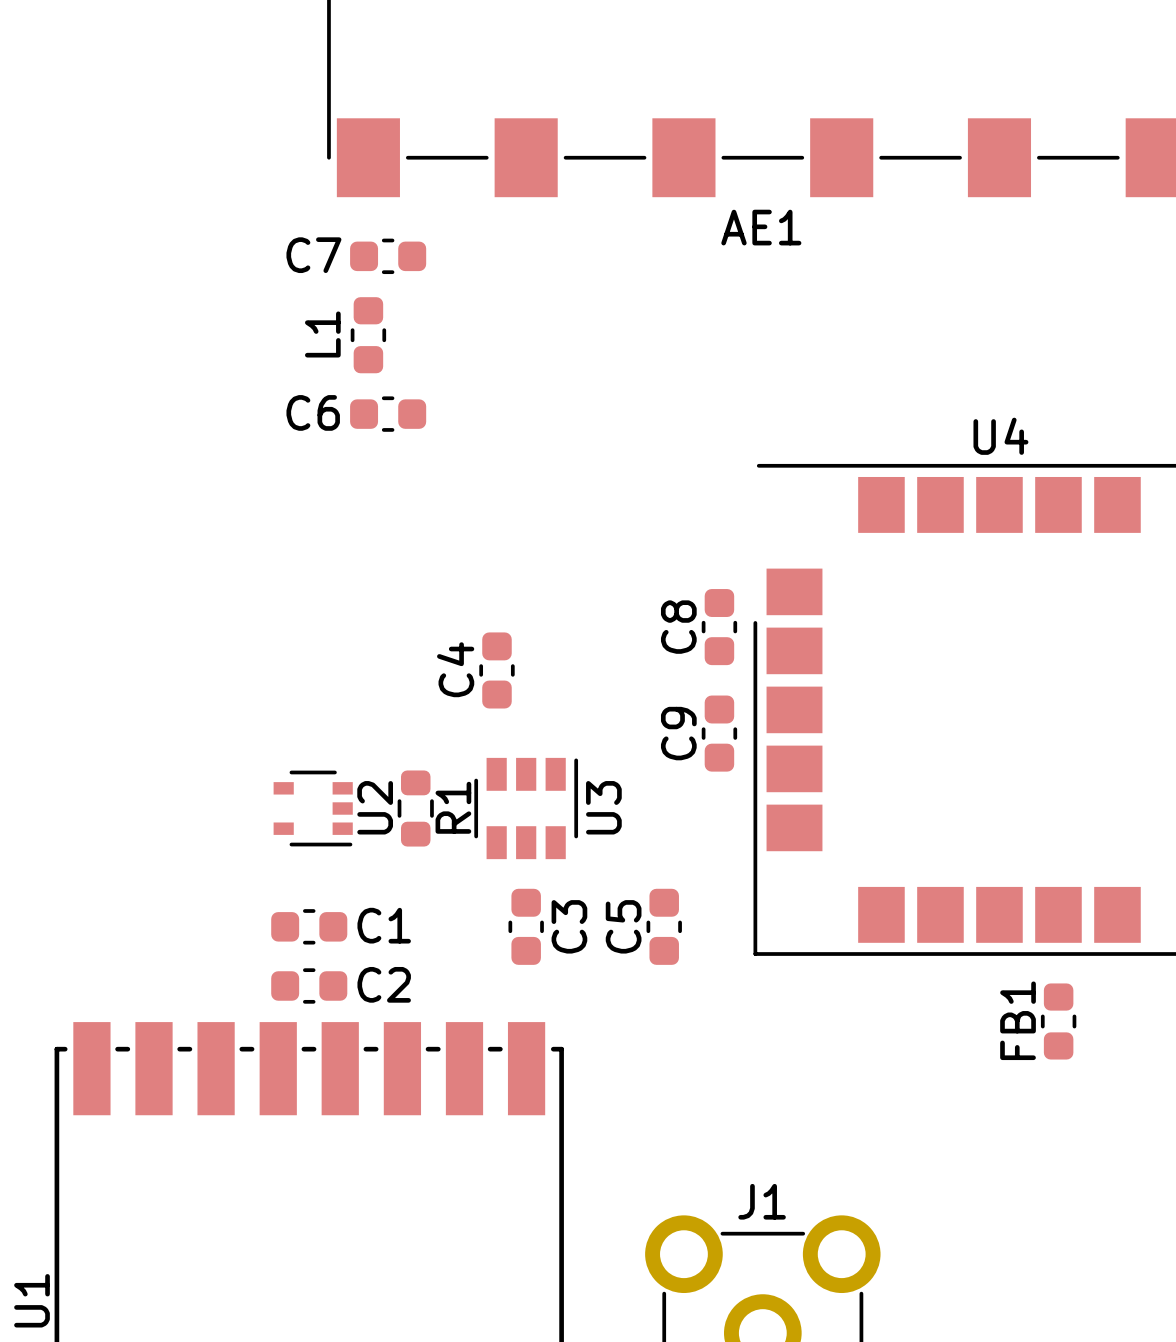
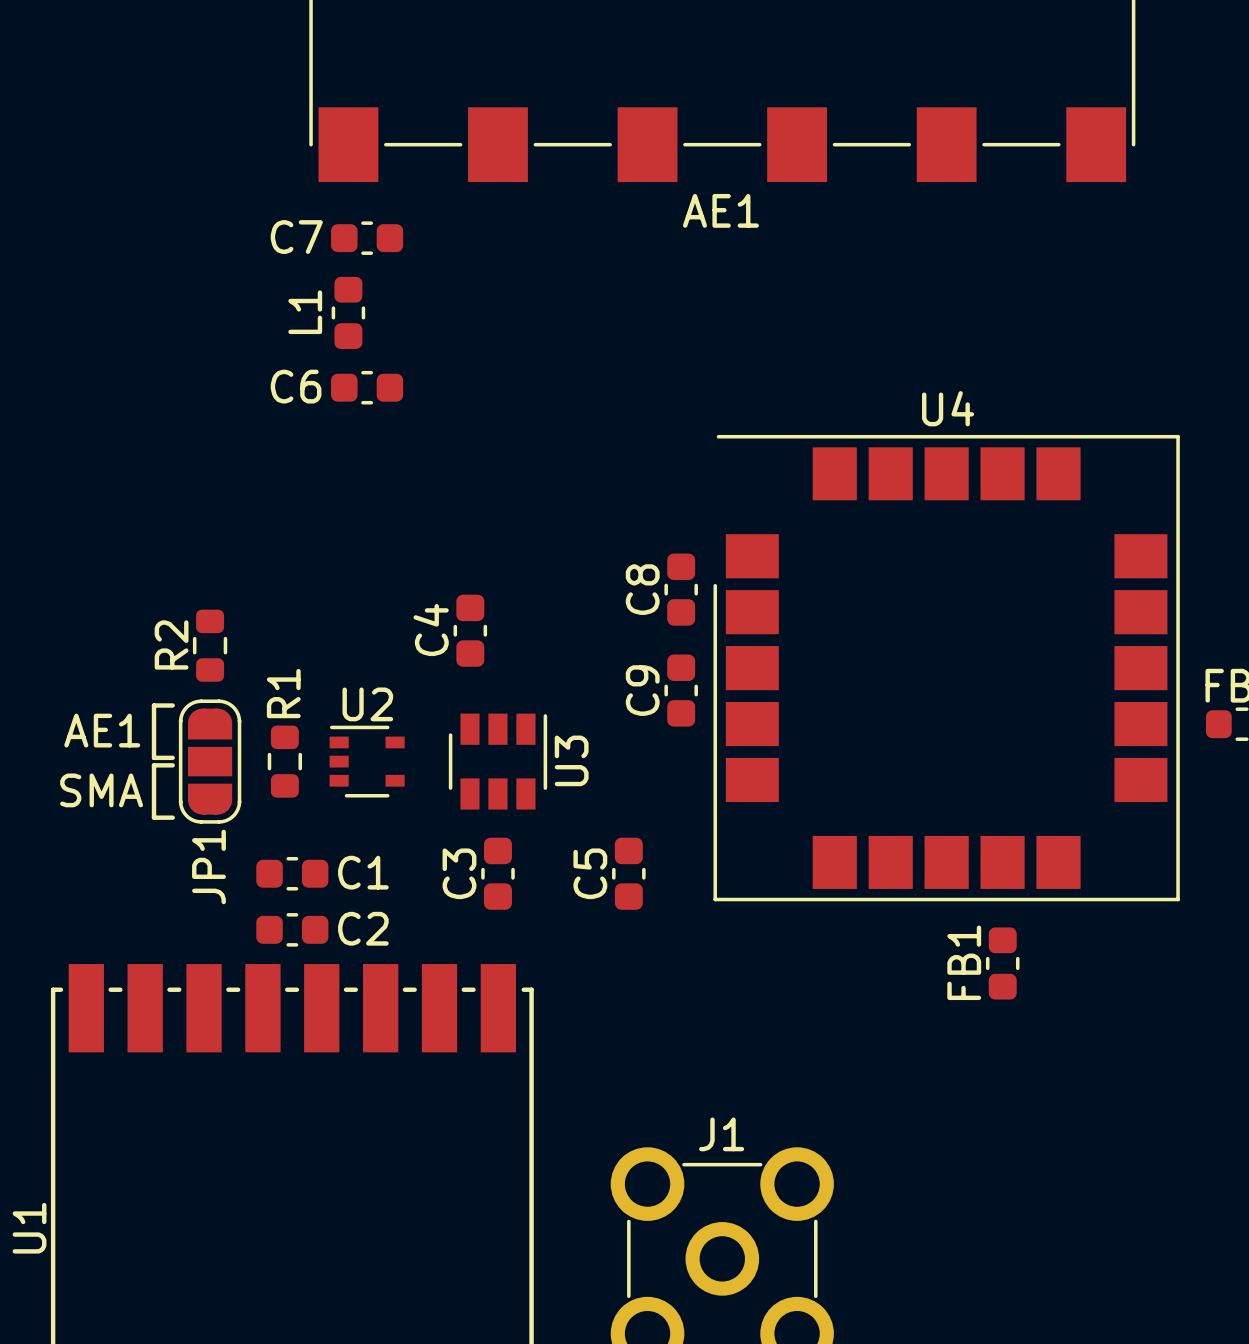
R2: none -> (210, 645)
line: none -> (172, 705) (154, 705) (154, 757) (172, 757)
text: none -> AE1 (102, 730)
U2 name position: U2 (375, 807) -> U2 (367, 704)
R1 name position: R1 (453, 807) -> R1 (283, 693)
JP1: none -> (210, 761)
U2 rotation: 0° (313, 808) -> 180° (367, 761)
U2 position: (313, 808) -> (367, 761)
R1 position: (415, 808) -> (284, 761)
line: none -> (172, 765) (154, 765) (154, 817) (172, 817)
text: none -> SMA (101, 790)
C3 name position: C3 (569, 926) -> C3 (459, 873)

